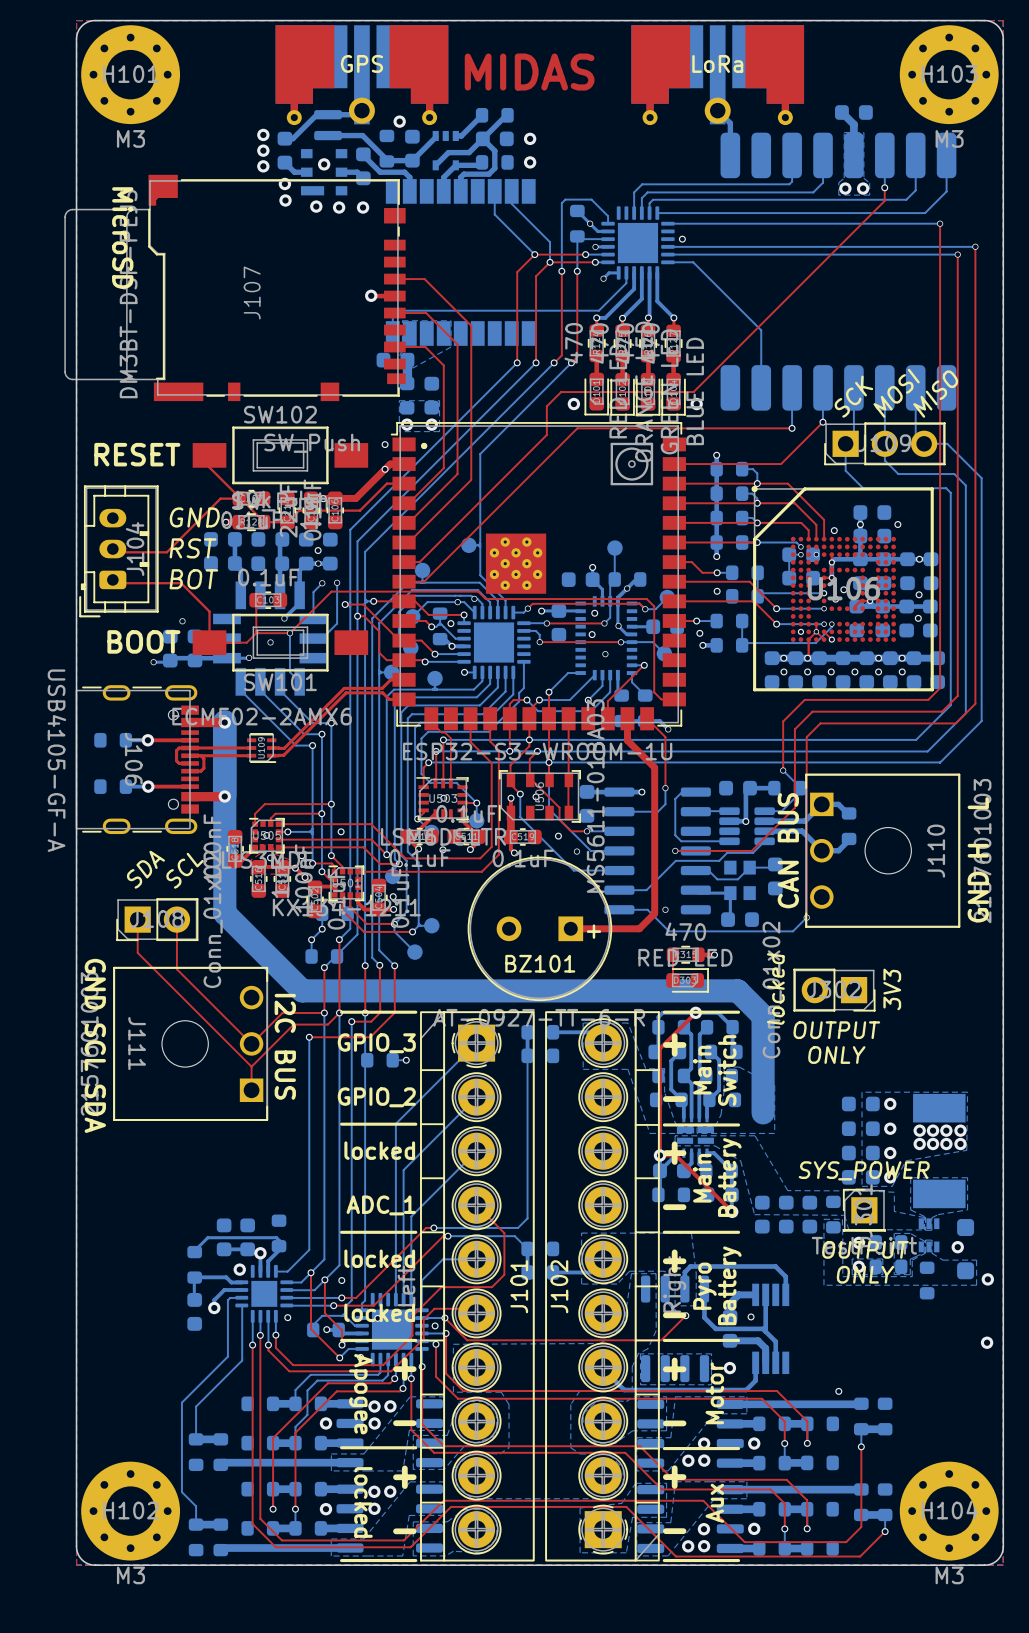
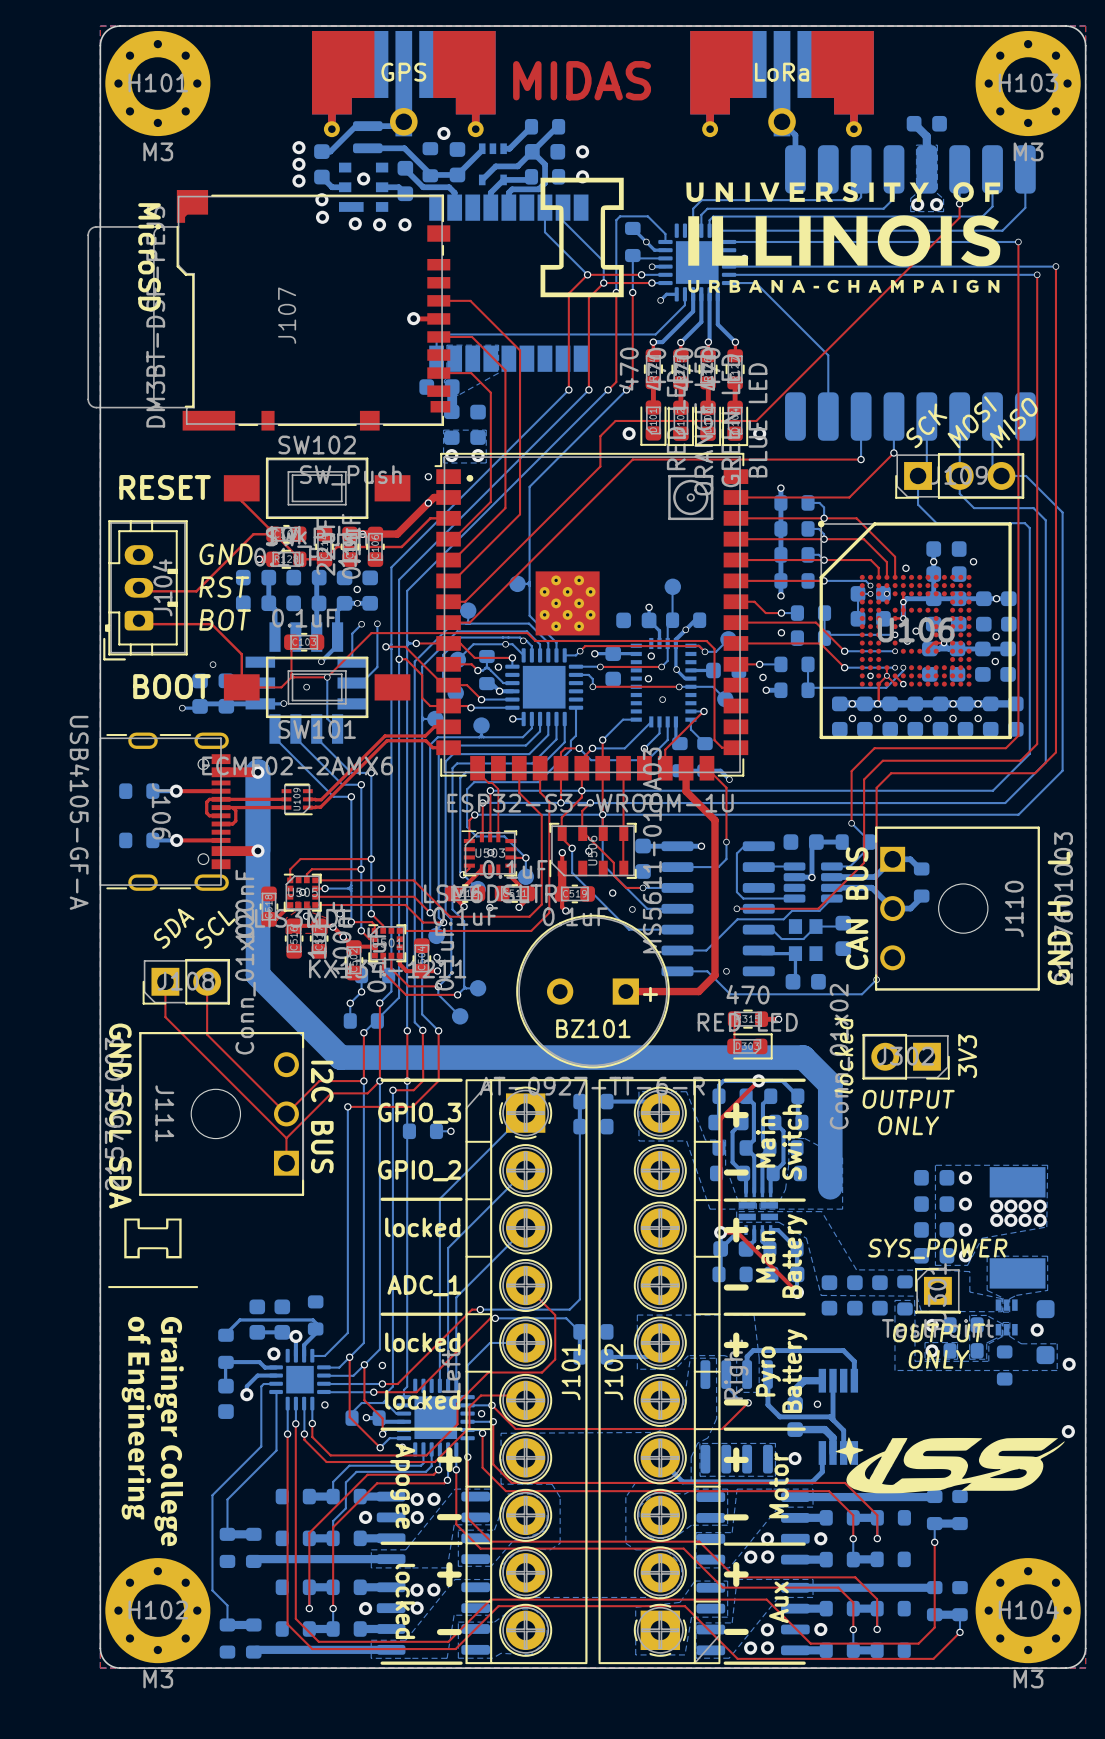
drawing: none -> [540, 177, 1001, 298]
drawing: none -> [108, 1218, 198, 1547]
drawing: none -> [835, 1437, 1065, 1494]

